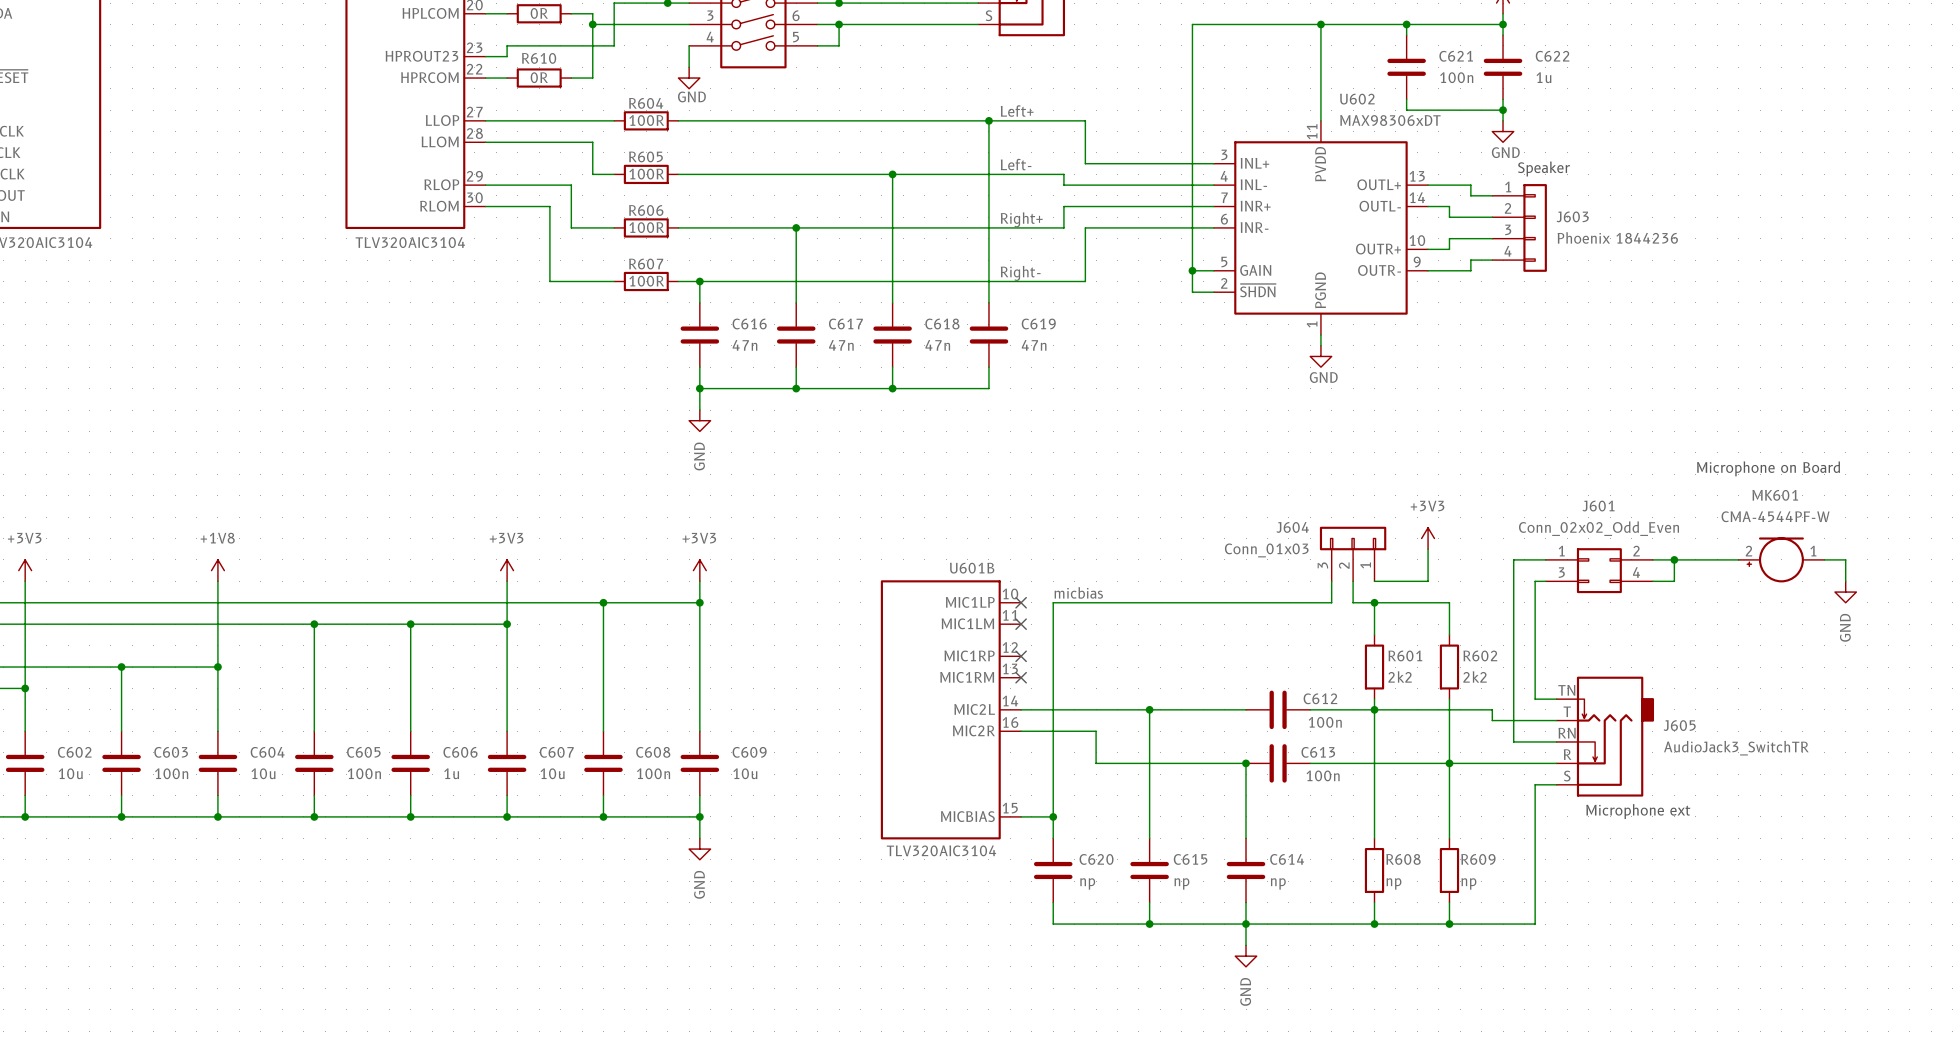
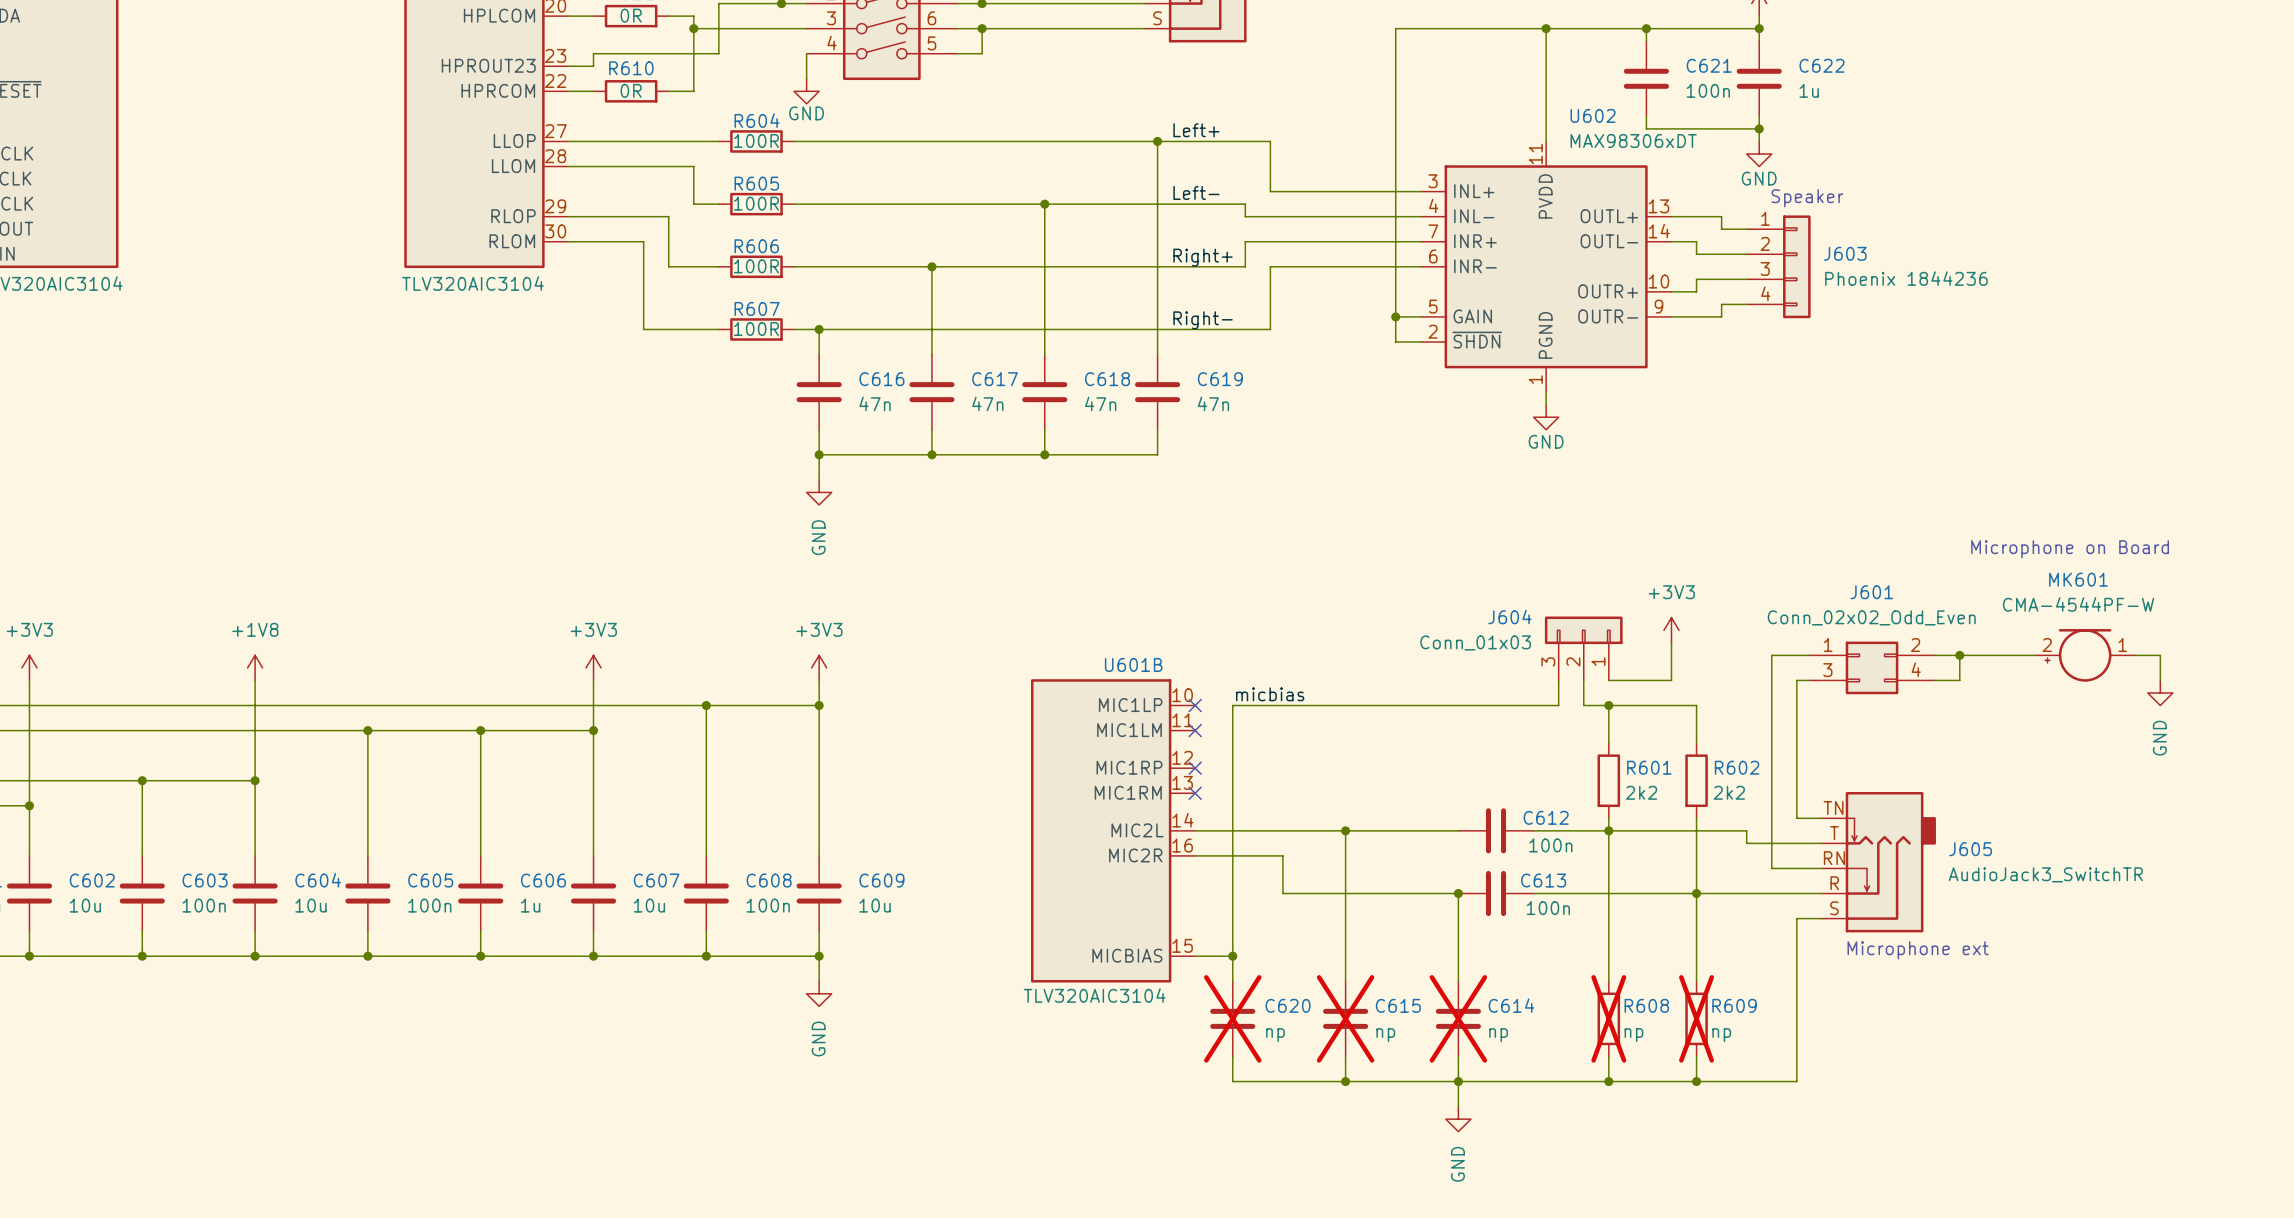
C620 do-not-place cross: none -> (1232, 1018)
C615 do-not-place cross: none -> (1345, 1018)
C614 do-not-place cross: none -> (1458, 1018)
R608 do-not-place cross: none -> (1608, 1018)
R609 do-not-place cross: none -> (1696, 1018)

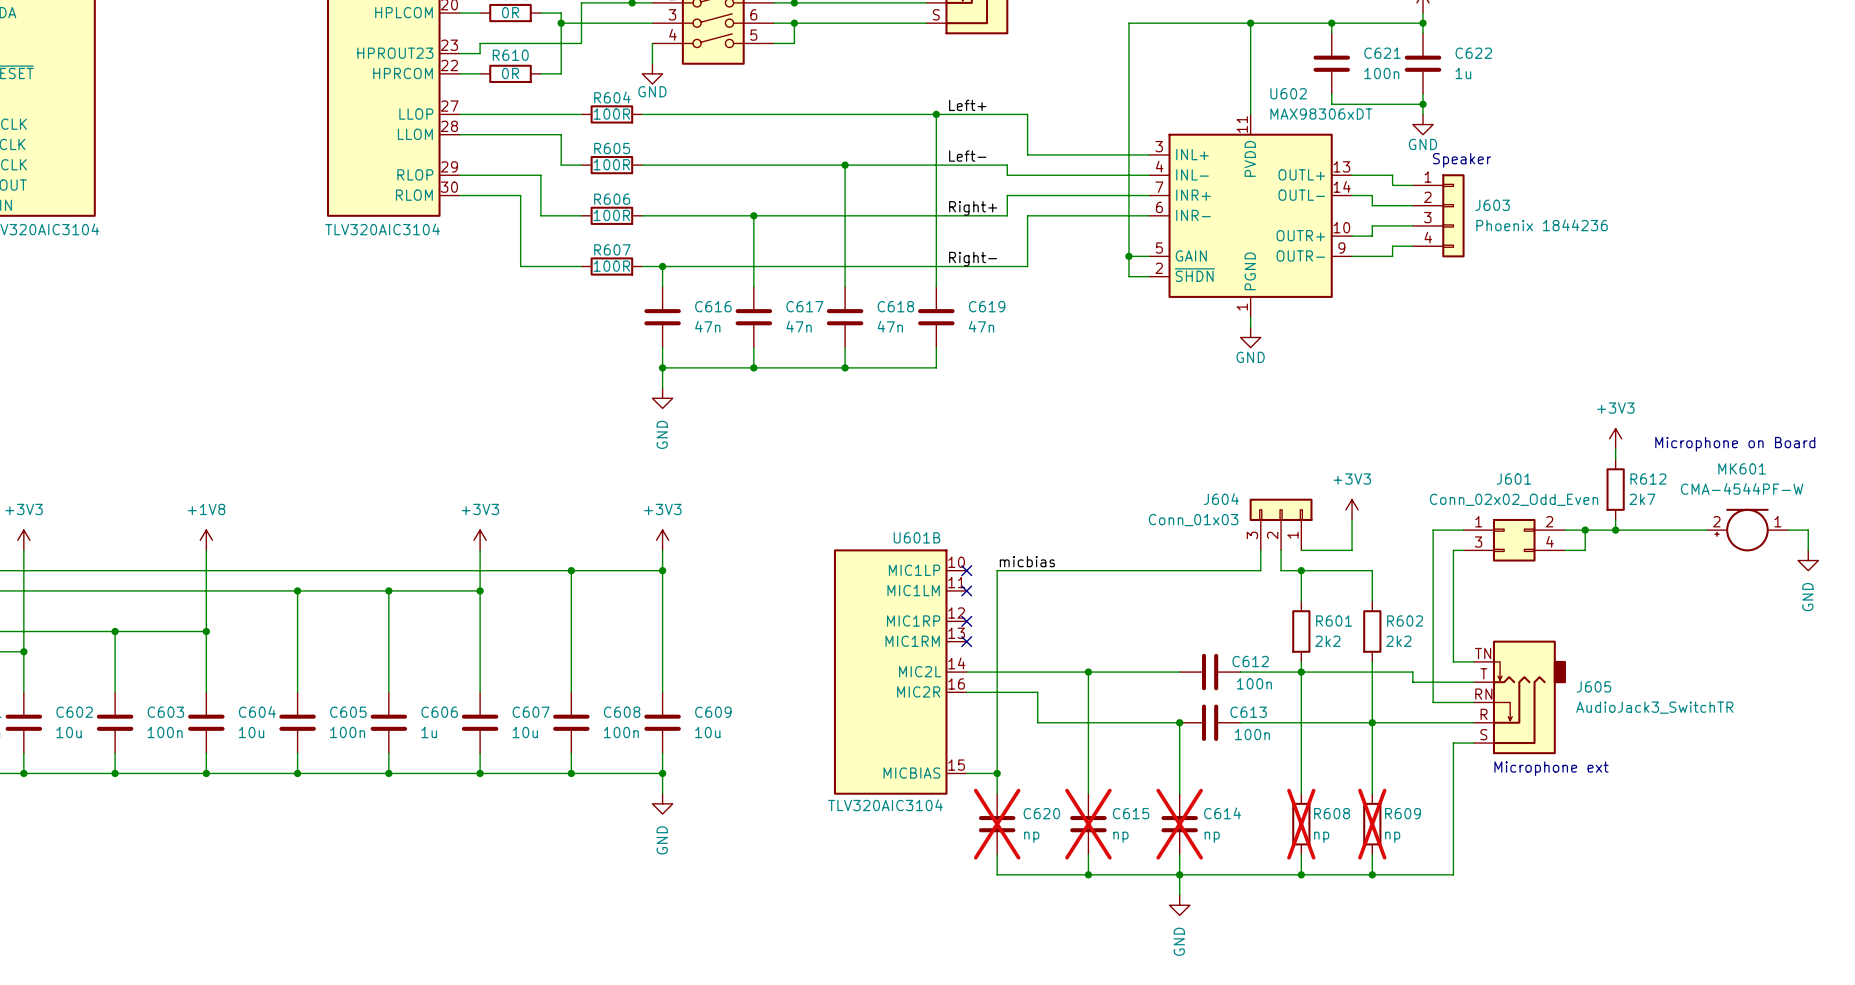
power symbol: none -> +3V3 (1615, 438)
text position: Microphone on Board (2070, 549) -> Microphone on Board (1735, 444)
wire: none -> (1615, 449) (1615, 459)
R612: none -> 2k7 (1615, 489)
wire: none -> (1615, 519) (1615, 530)
junction: none -> (1615, 530)
wire: none -> (1646, 530) (1706, 530)
MK601 position: (2085, 655) -> (1747, 530)
wire: (2135, 655) (2160, 655) (2160, 680) -> (1787, 530) (1808, 530) (1808, 550)
power symbol position: GND (2160, 692) -> GND (1808, 560)

